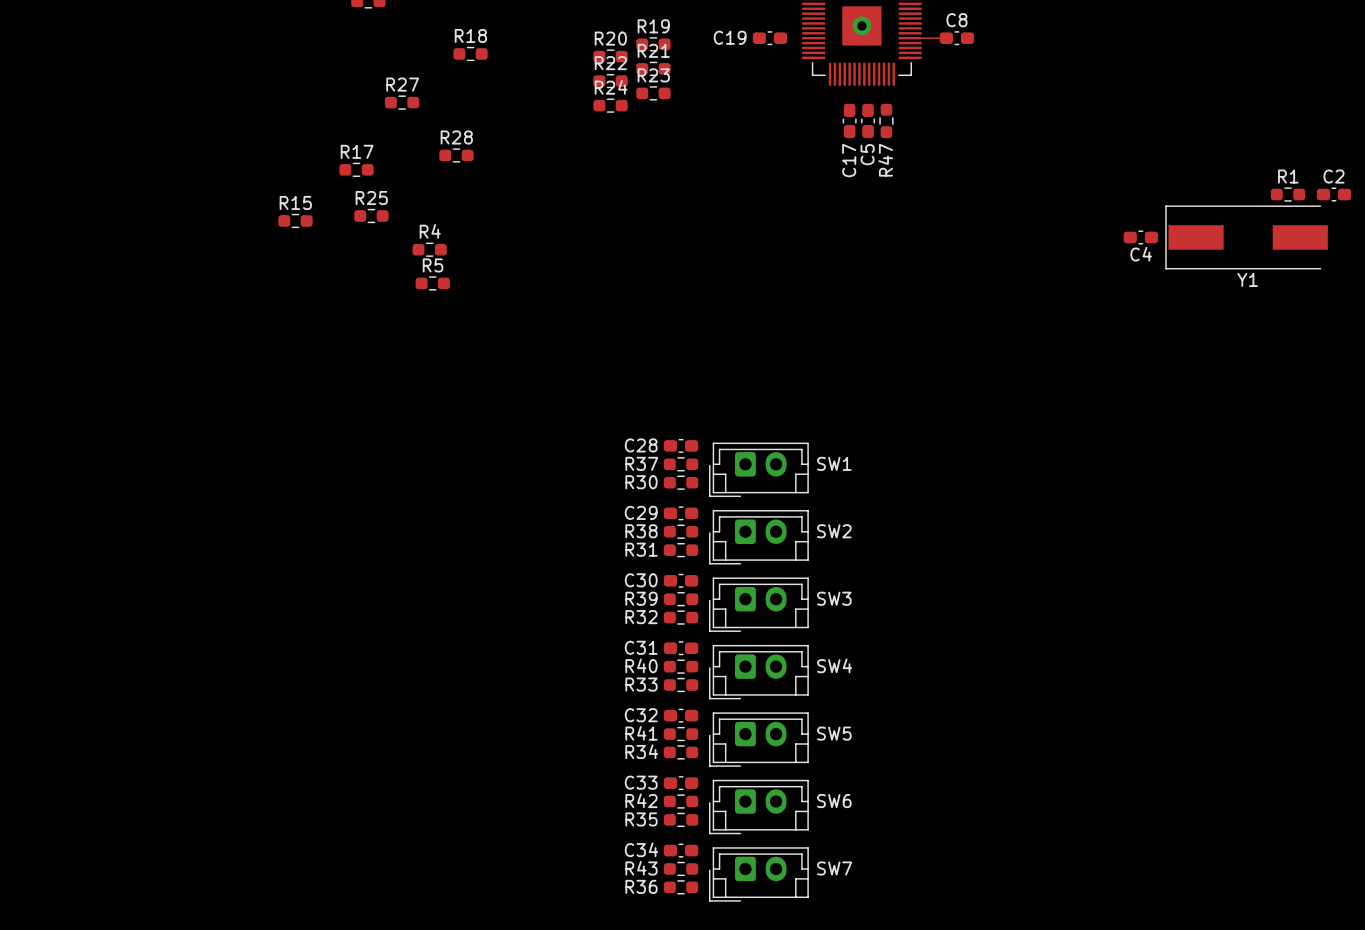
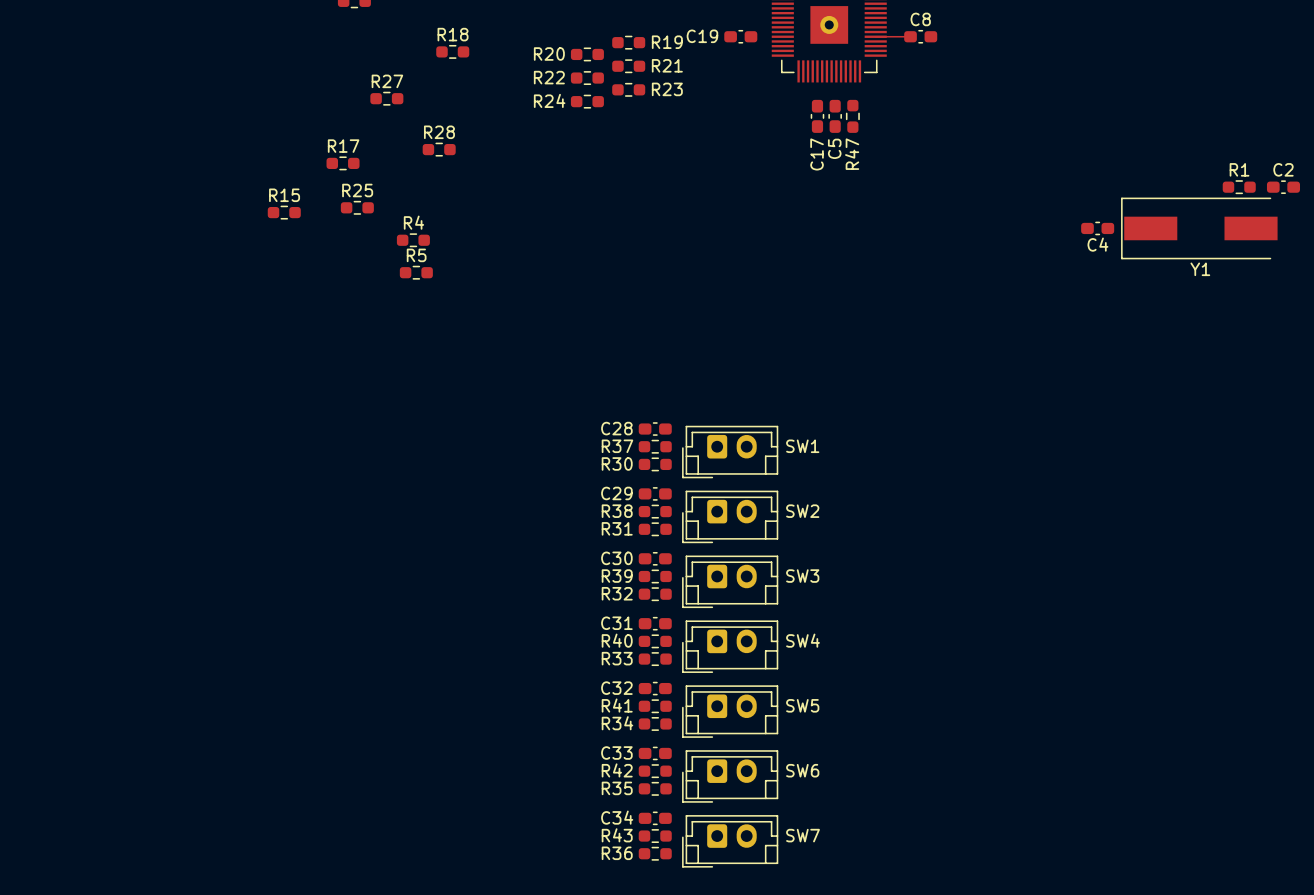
R19 name position: R19 (653, 26) -> R19 (667, 42)
R20 name position: R20 (610, 38) -> R20 (549, 54)
R21 name position: R21 (653, 50) -> R21 (667, 65)
R22 name position: R22 (610, 63) -> R22 (549, 77)
R23 name position: R23 (653, 75) -> R23 (667, 89)
R24 name position: R24 (611, 87) -> R24 (549, 100)

